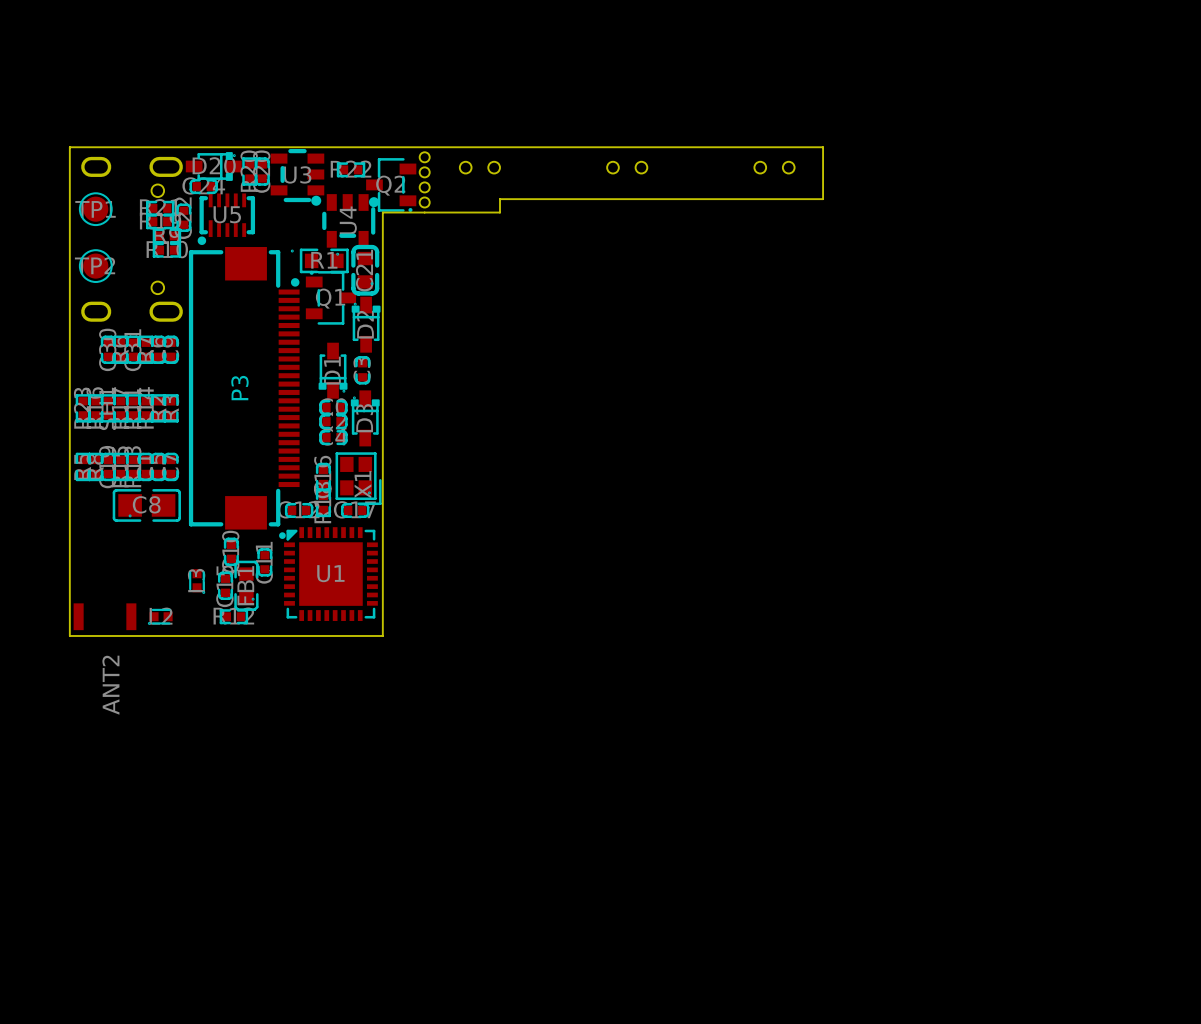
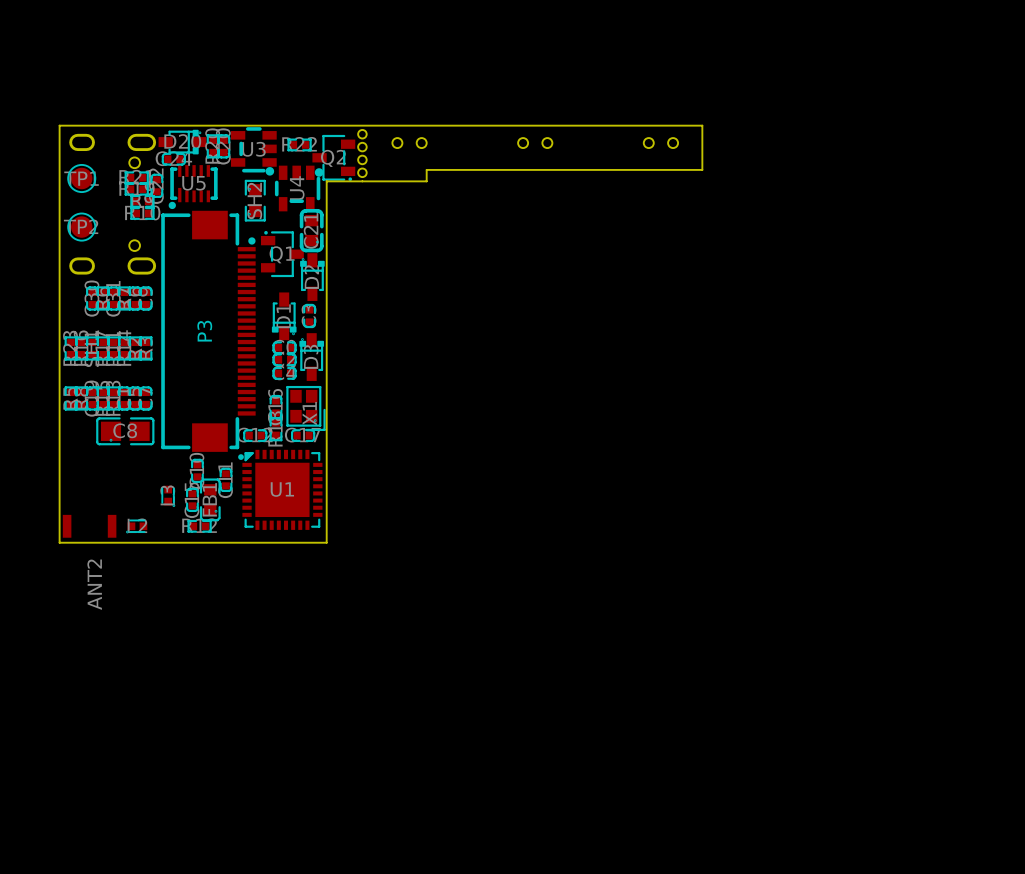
SH2: none -> (255, 200)
R1: (324, 260) -> none

